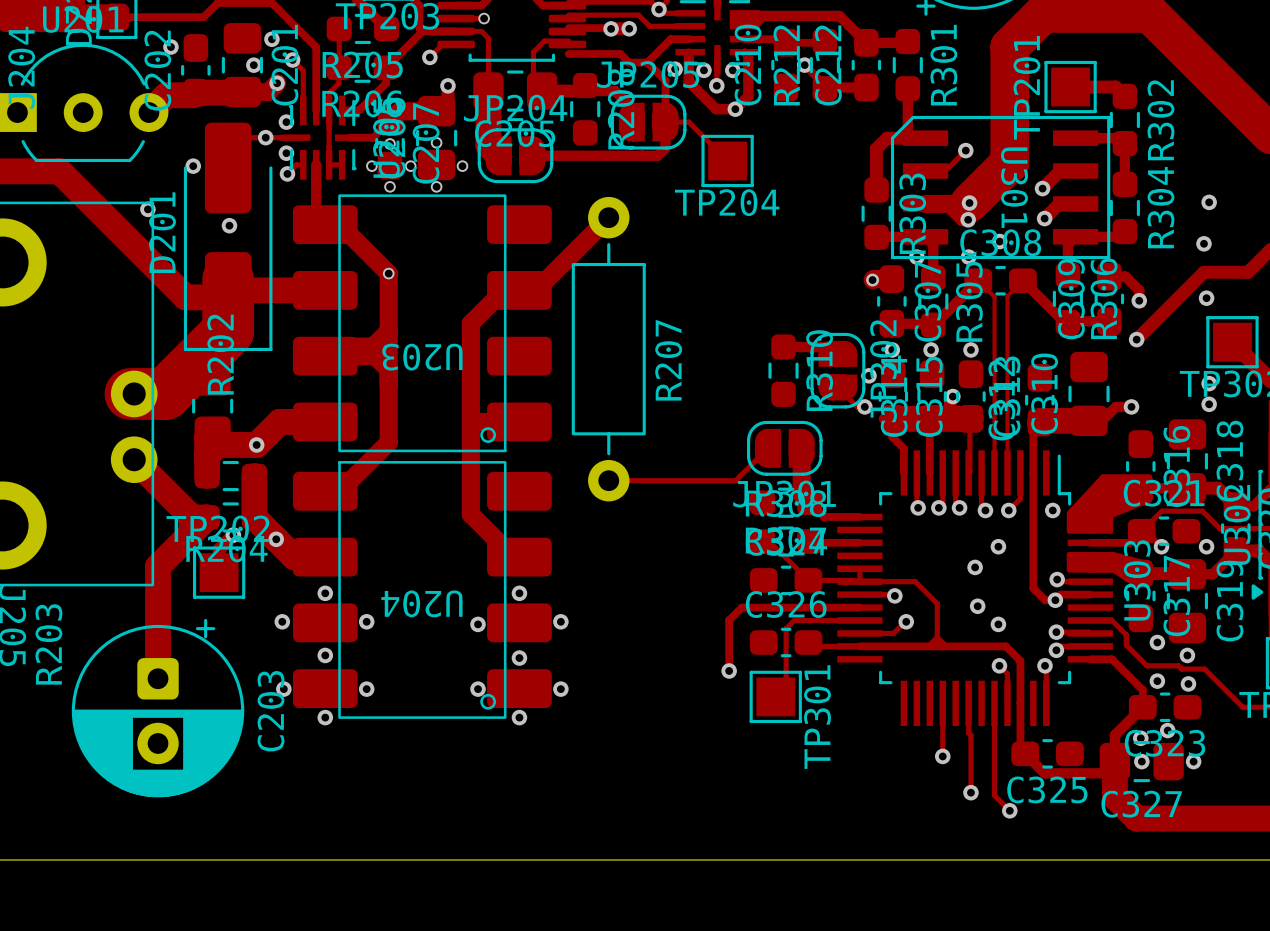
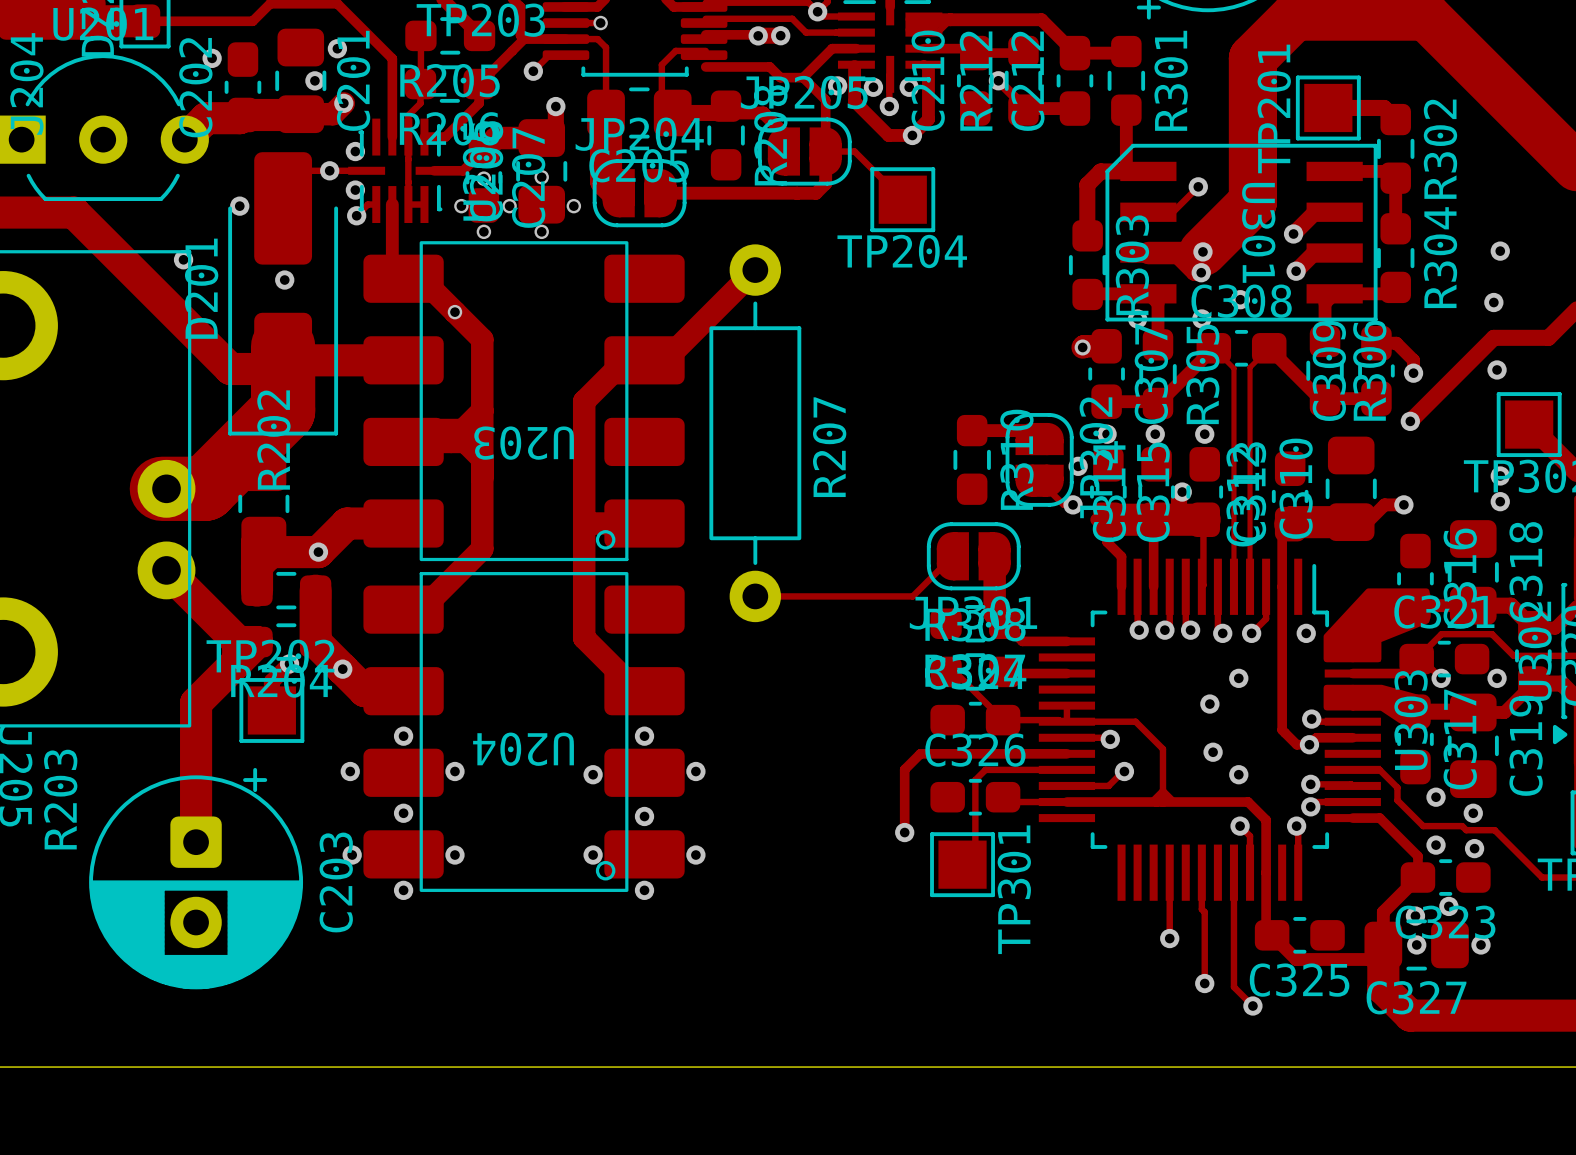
track: (292, 59) (303, 70) (303, 110) -> none
via: (292, 59) -> none
via position: (388, 273) -> (454, 312)

